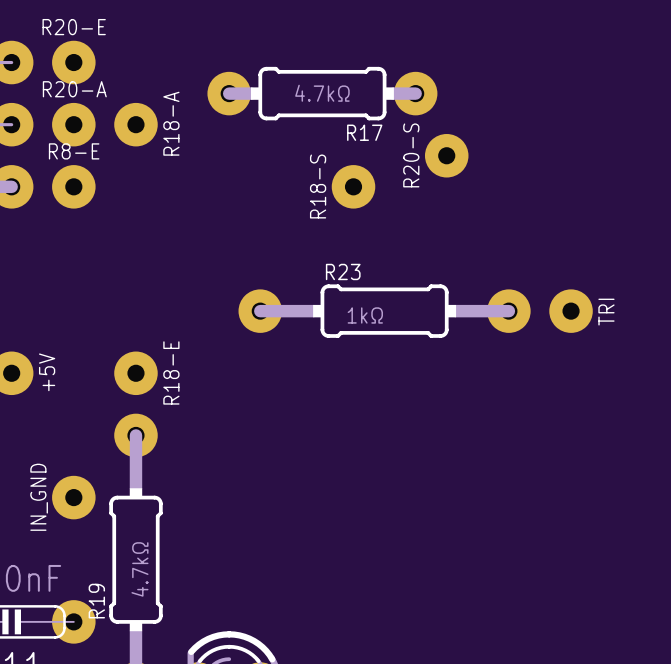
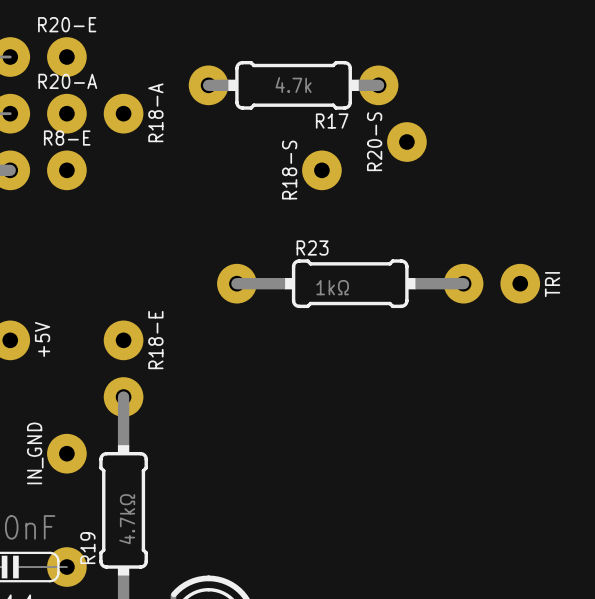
R17 value: 4.7kΩ (322, 93) -> 4.7k (293, 85)

